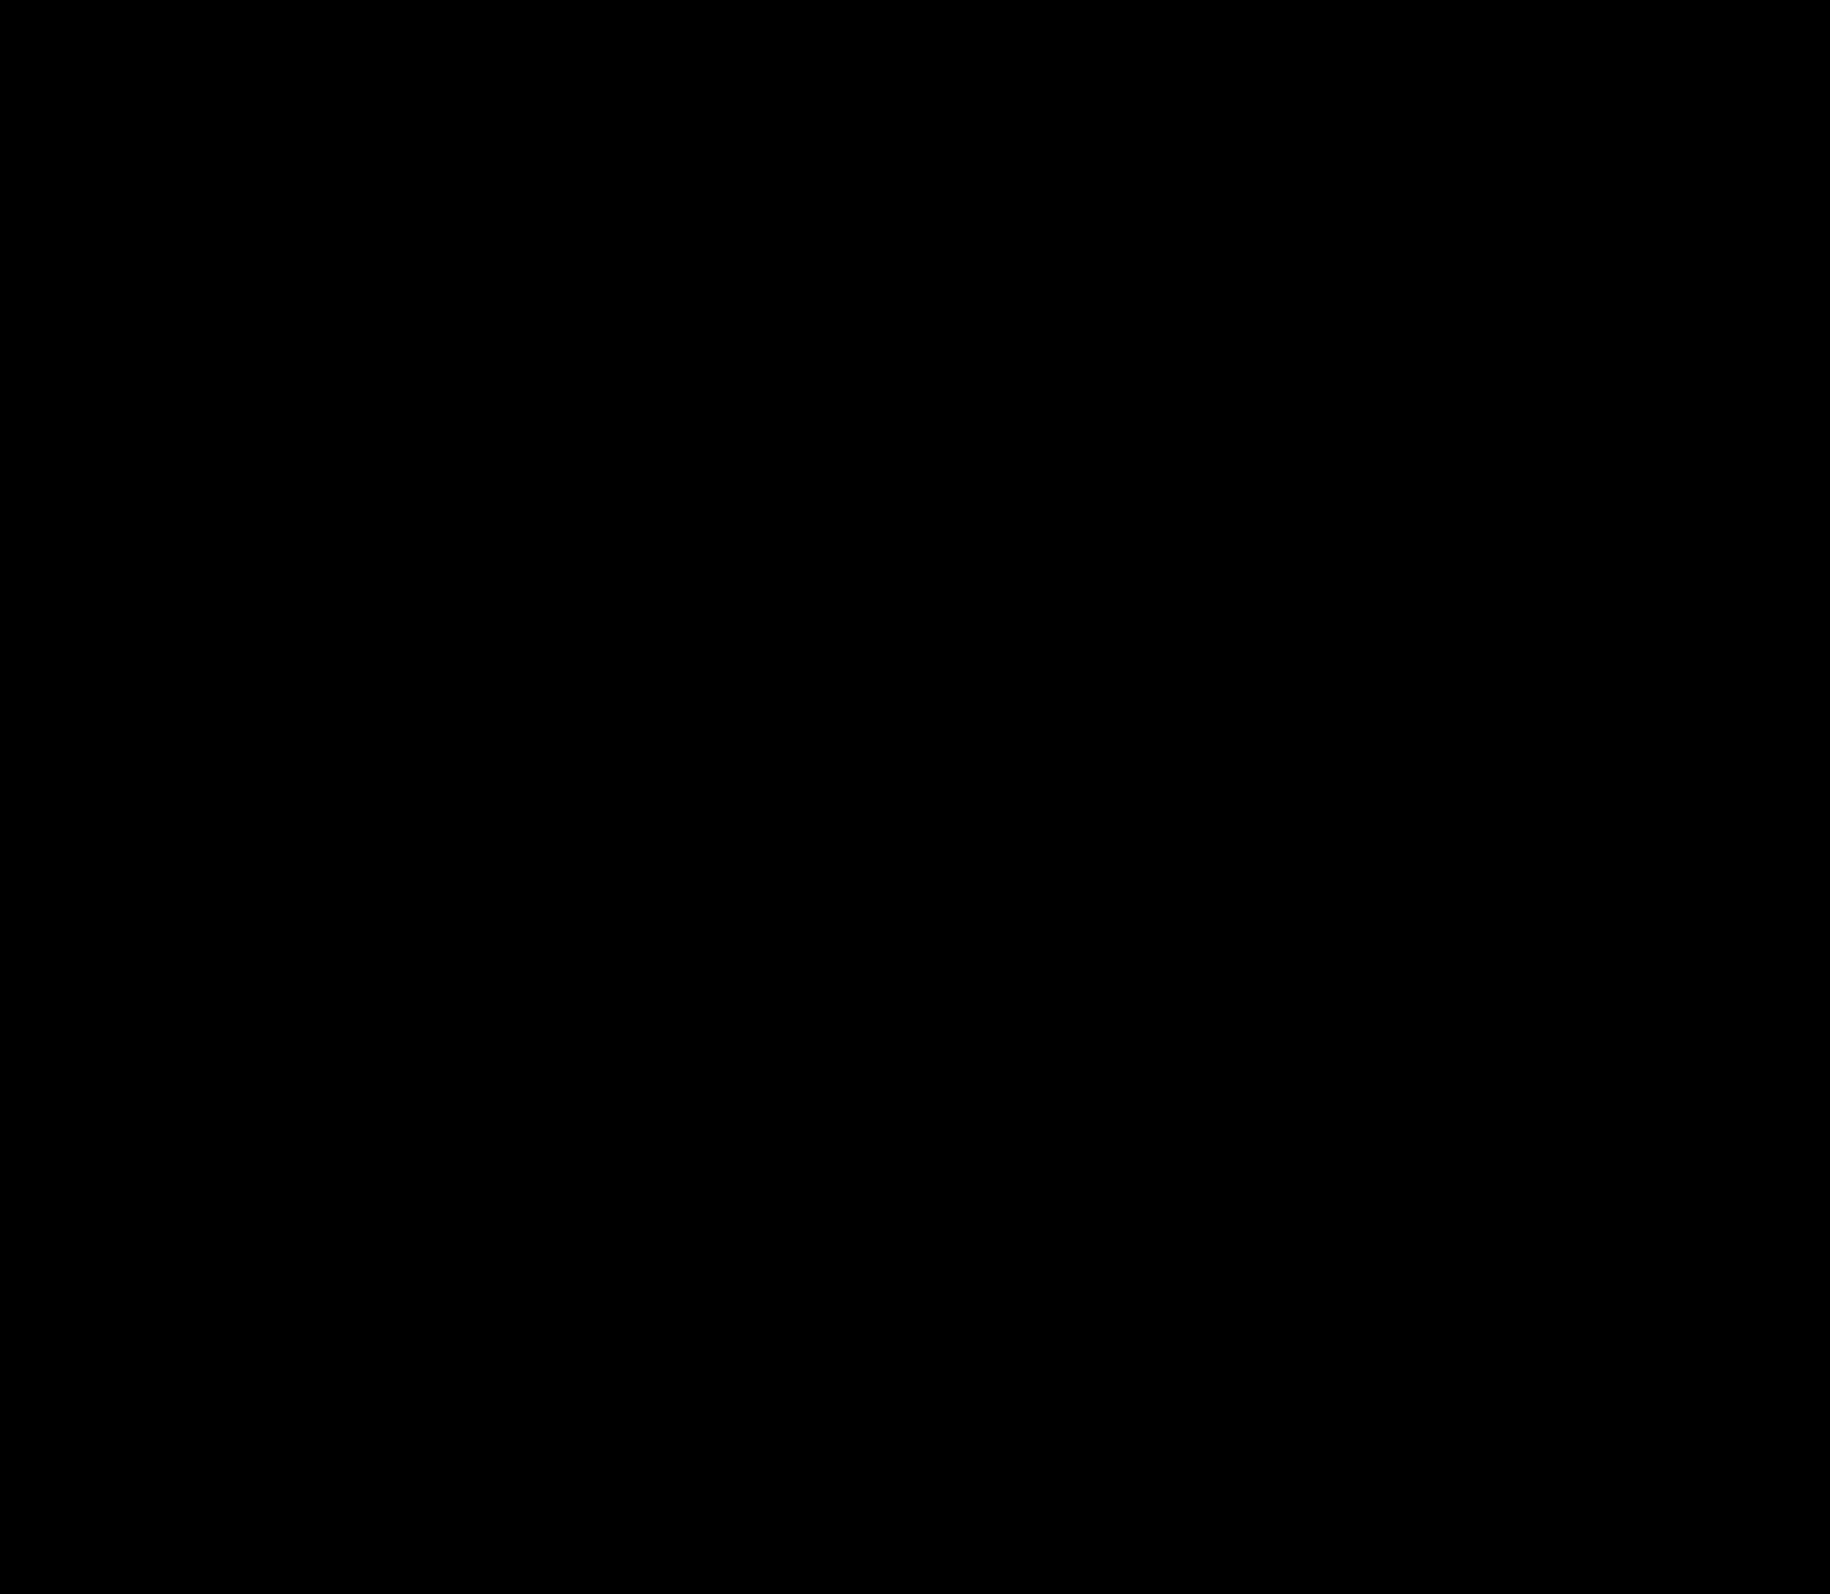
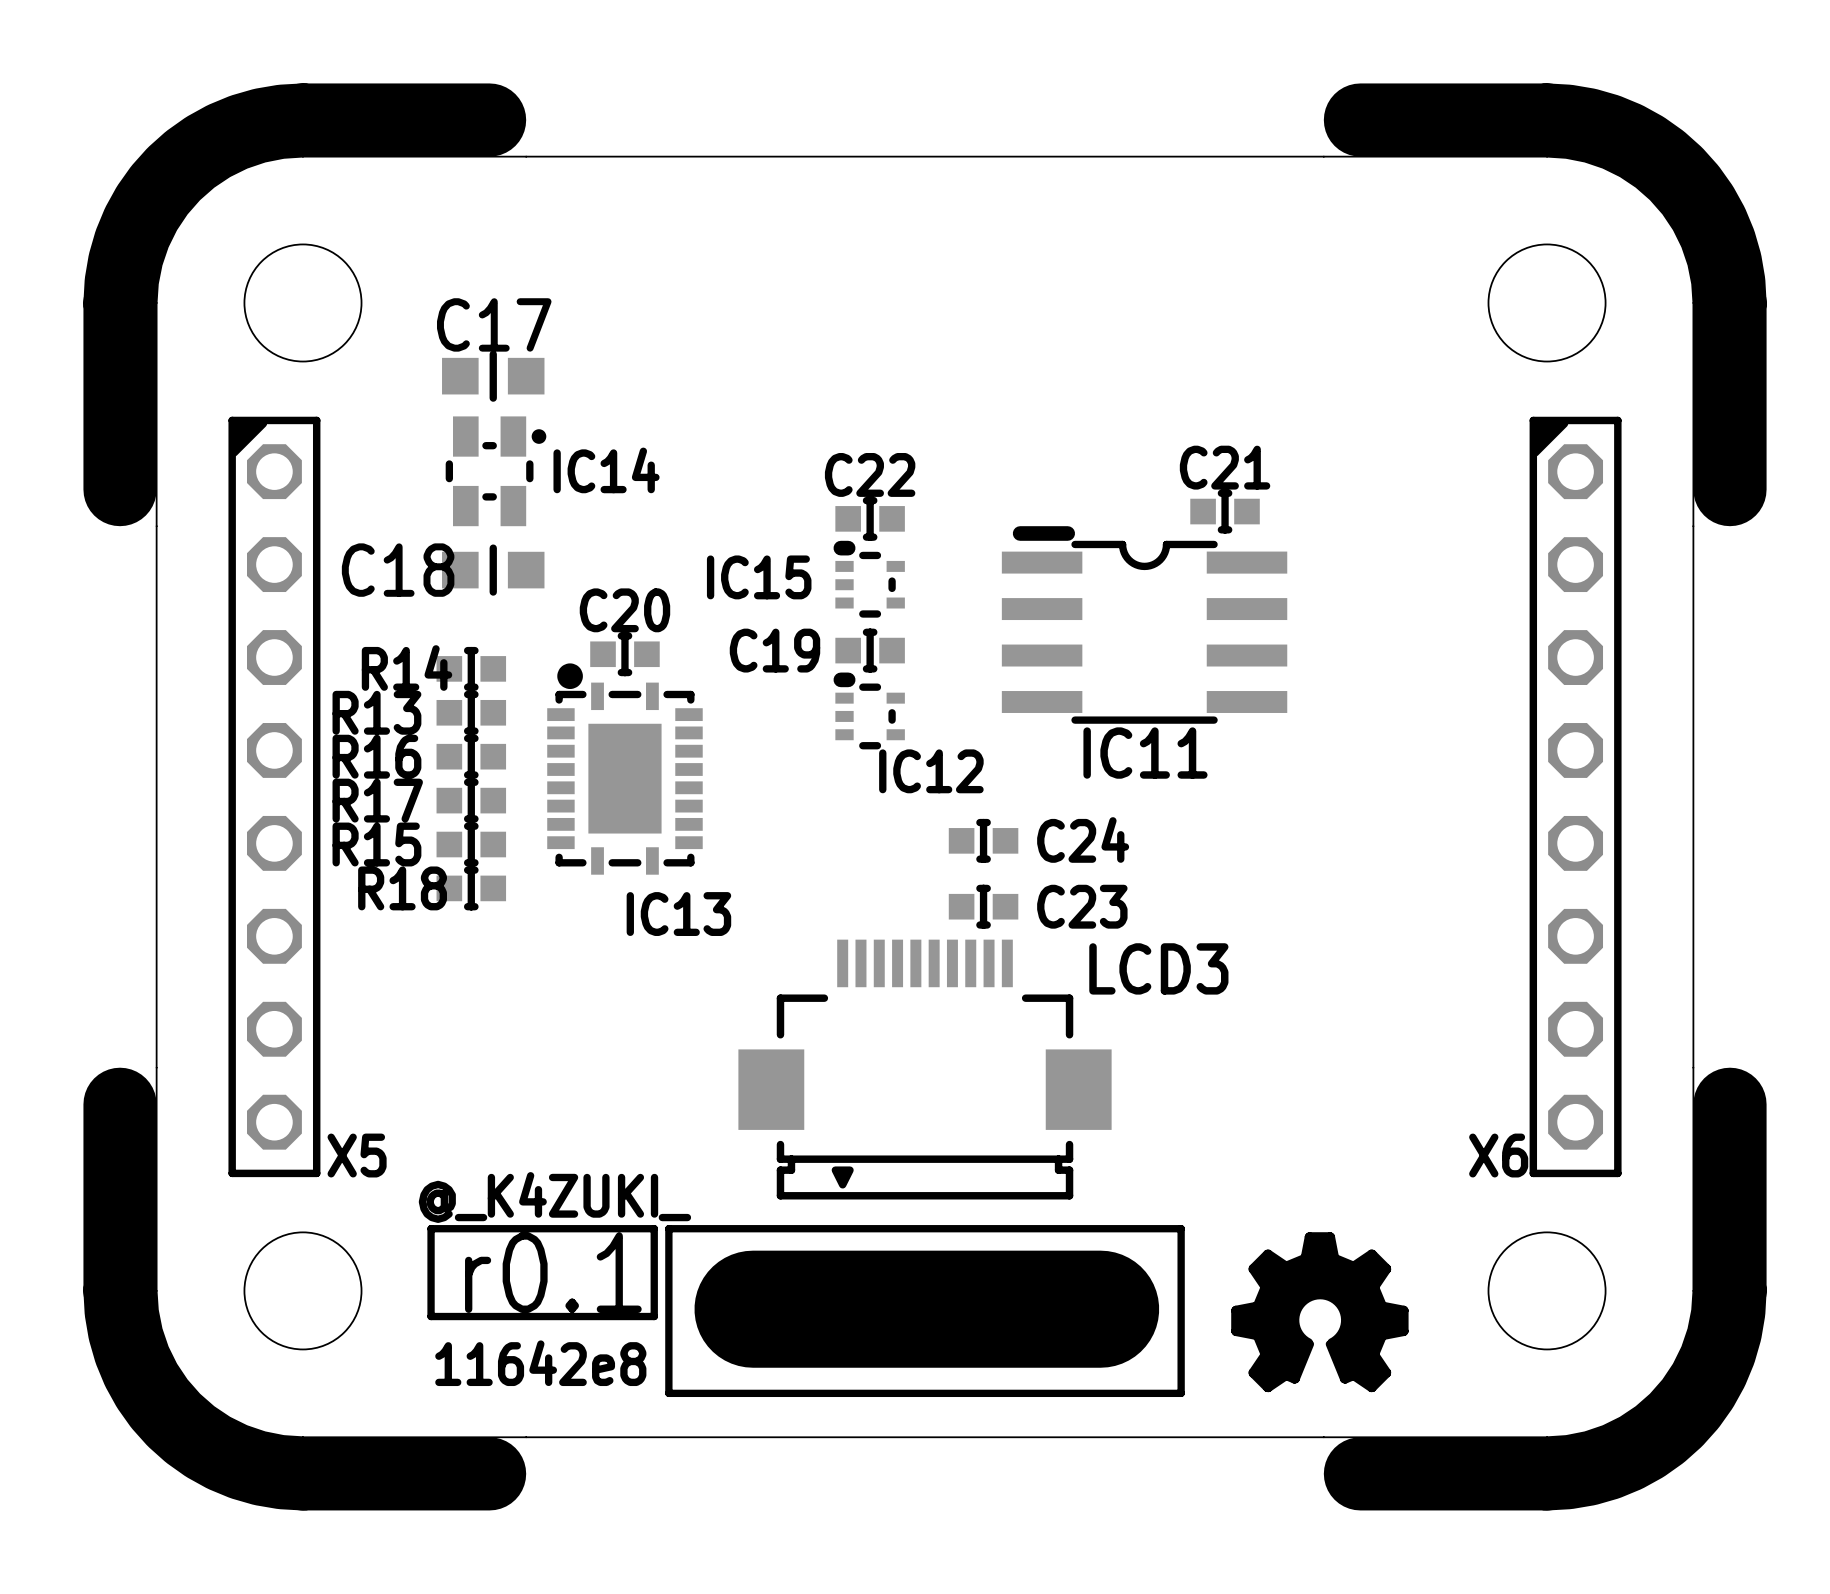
board edge: none -> (526, 156) (1323, 156)
part: none -> (304, 304)
part: none -> (1545, 304)
C17: none -> (493, 376)
IC14: none -> (495, 471)
C21: none -> (1225, 511)
C22: none -> (870, 518)
board edge: none -> (156, 526) (156, 1067)
board edge: none -> (1693, 526) (1693, 1067)
C18: none -> (493, 570)
IC15: none -> (869, 579)
IC11: none -> (1144, 624)
C19: none -> (870, 650)
C20: none -> (624, 654)
R14: none -> (471, 668)
IC12: none -> (869, 710)
R13: none -> (471, 712)
R16: none -> (471, 756)
IC13: none -> (624, 769)
X5: none -> (274, 796)
X6: none -> (1575, 796)
R17: none -> (471, 800)
C24: none -> (983, 840)
R15: none -> (471, 844)
R18: none -> (471, 888)
C23: none -> (983, 906)
LCD3: none -> (925, 1168)
text: none -> @_K4ZUKI_ (554, 1197)
drawing: none -> [427, 1225, 658, 1321]
drawing: none -> [1231, 1232, 1409, 1393]
part: none -> (304, 1289)
part: none -> (1545, 1289)
board edge: none -> (526, 1437) (1323, 1437)

